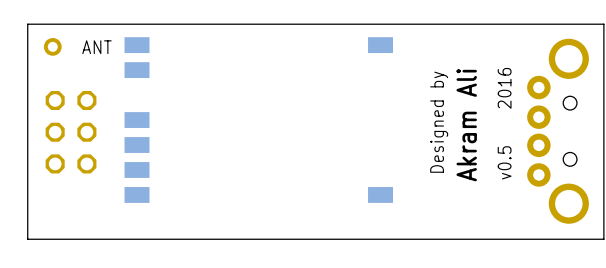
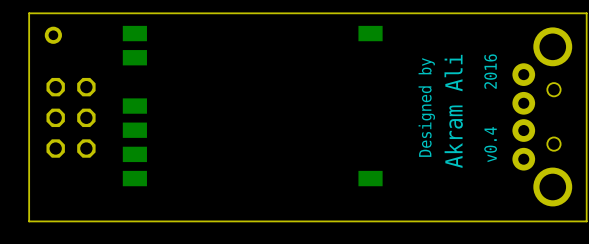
text: ANT (97, 47) -> none
text: v0.5 2016 (504, 123) -> v0.4 2016 (490, 108)

